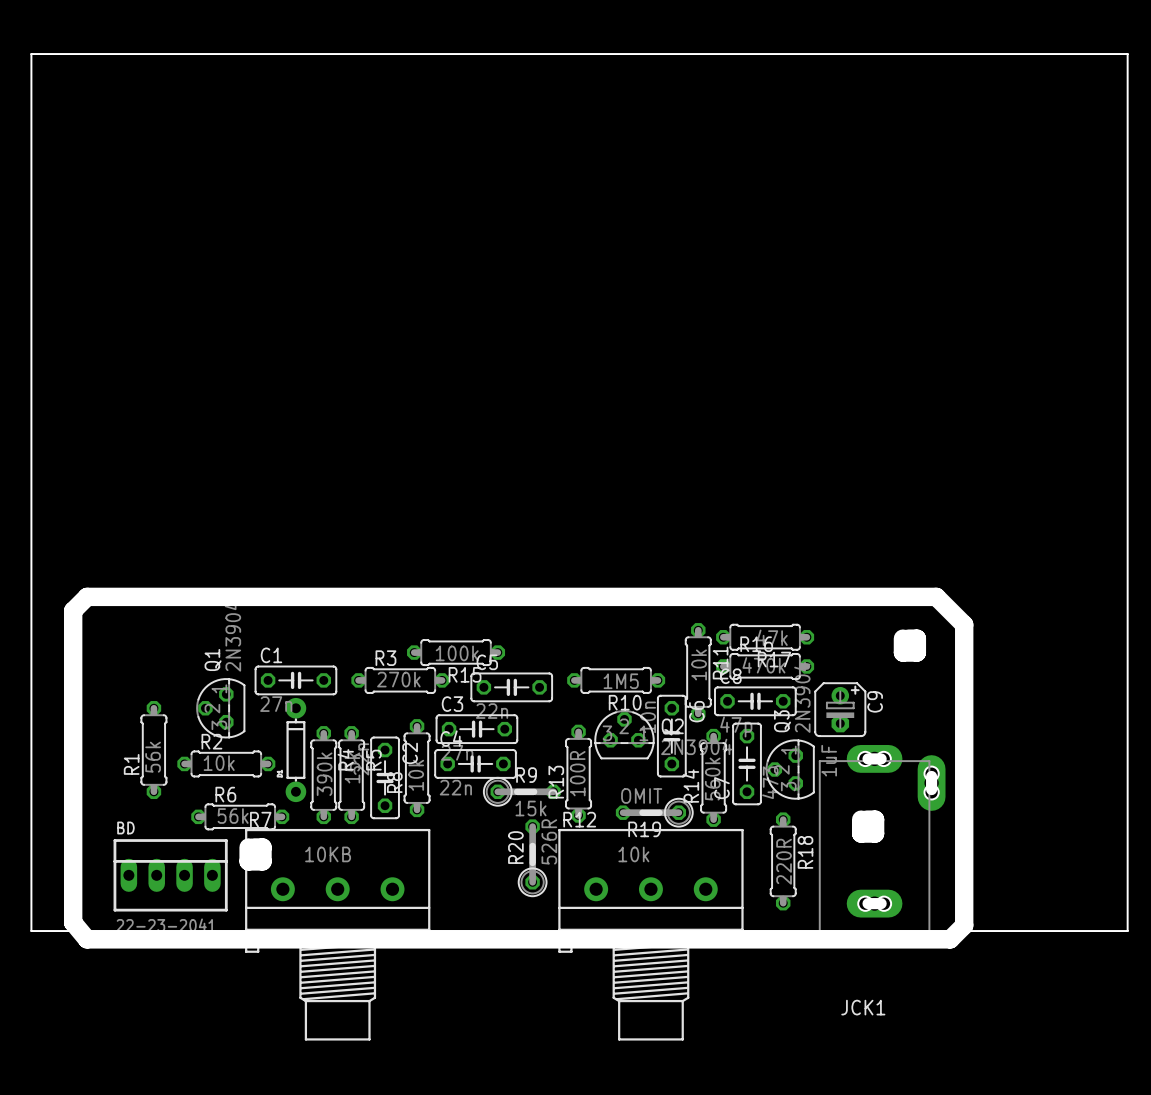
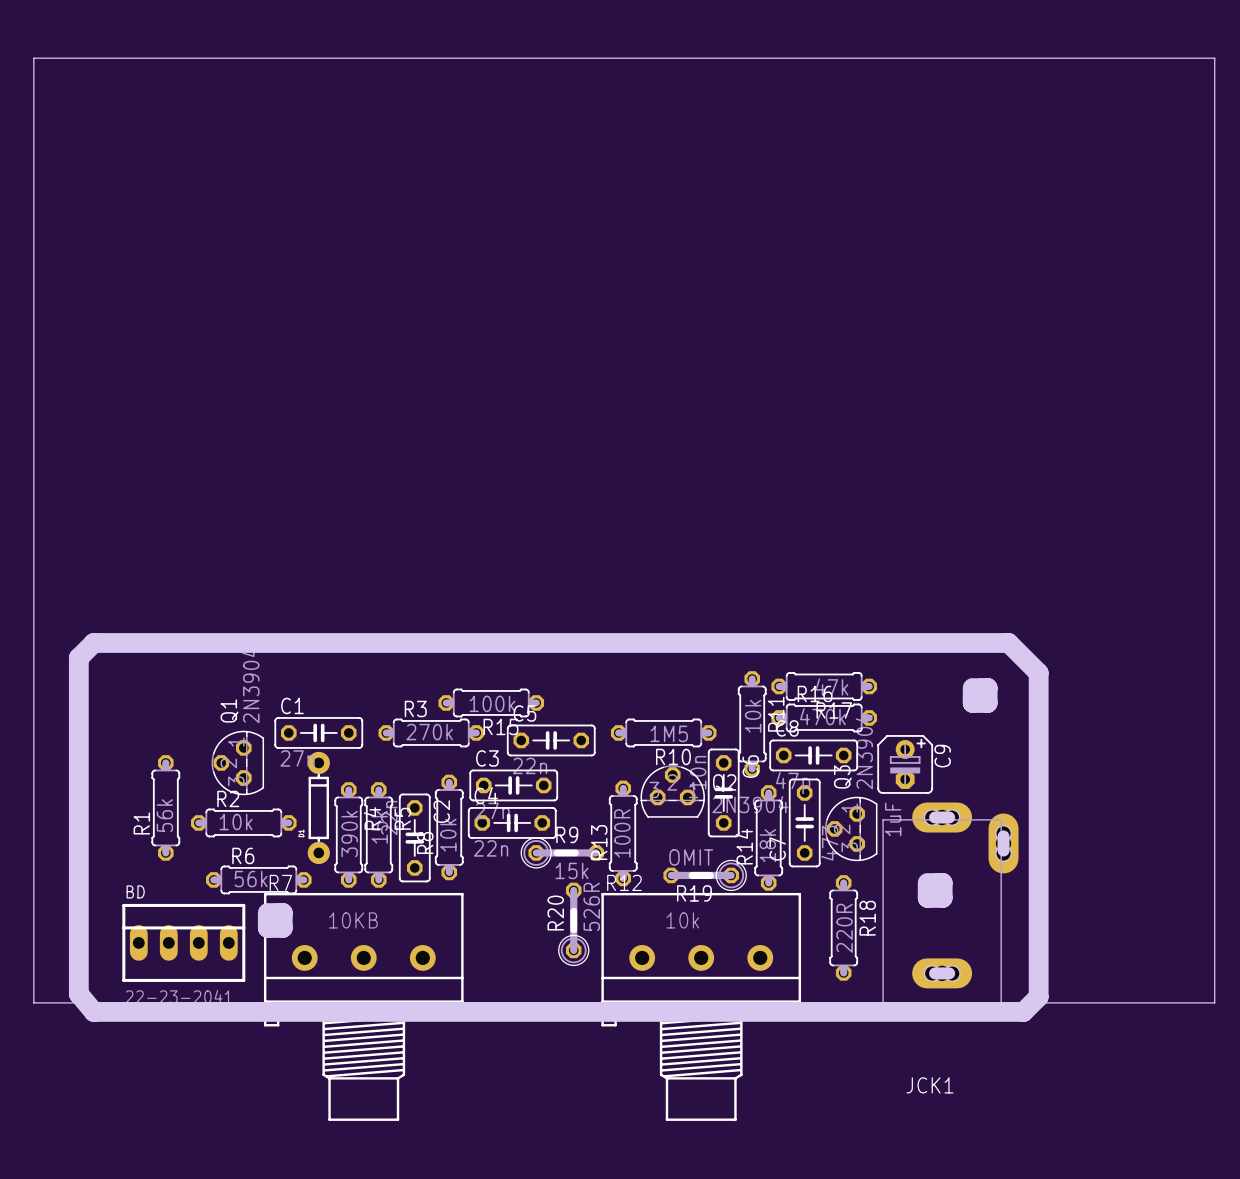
R14 value: 560k (712, 779) -> 18k (767, 845)

